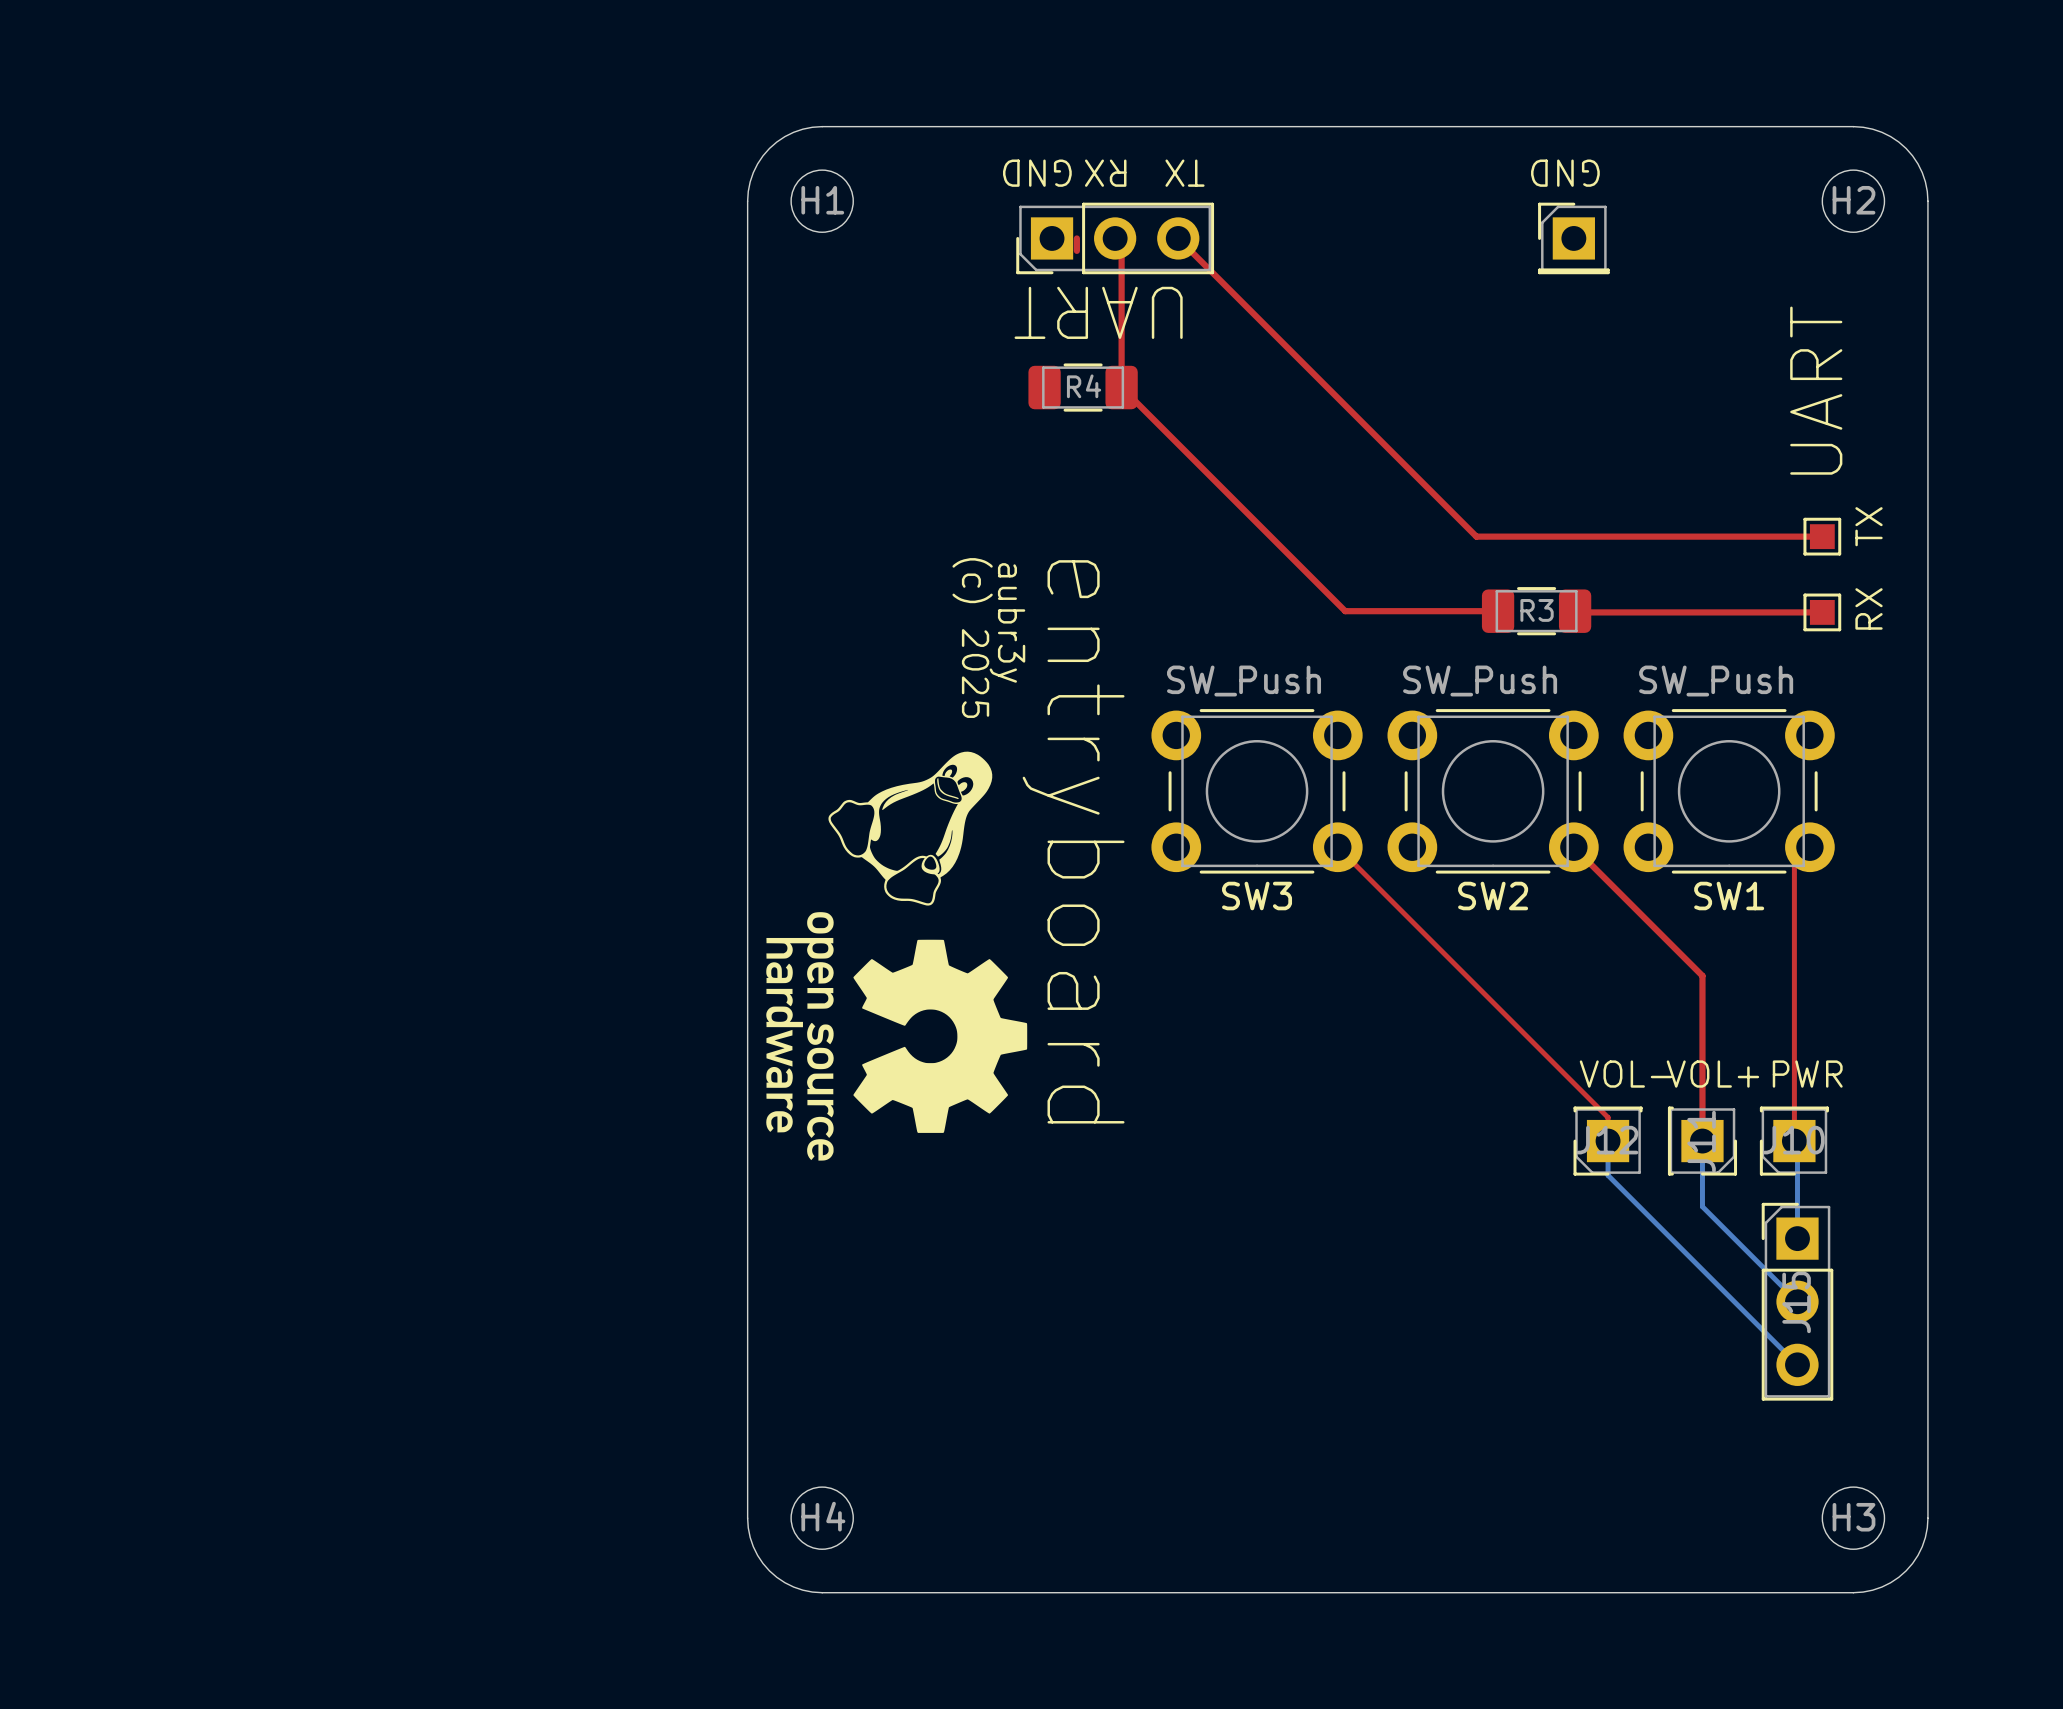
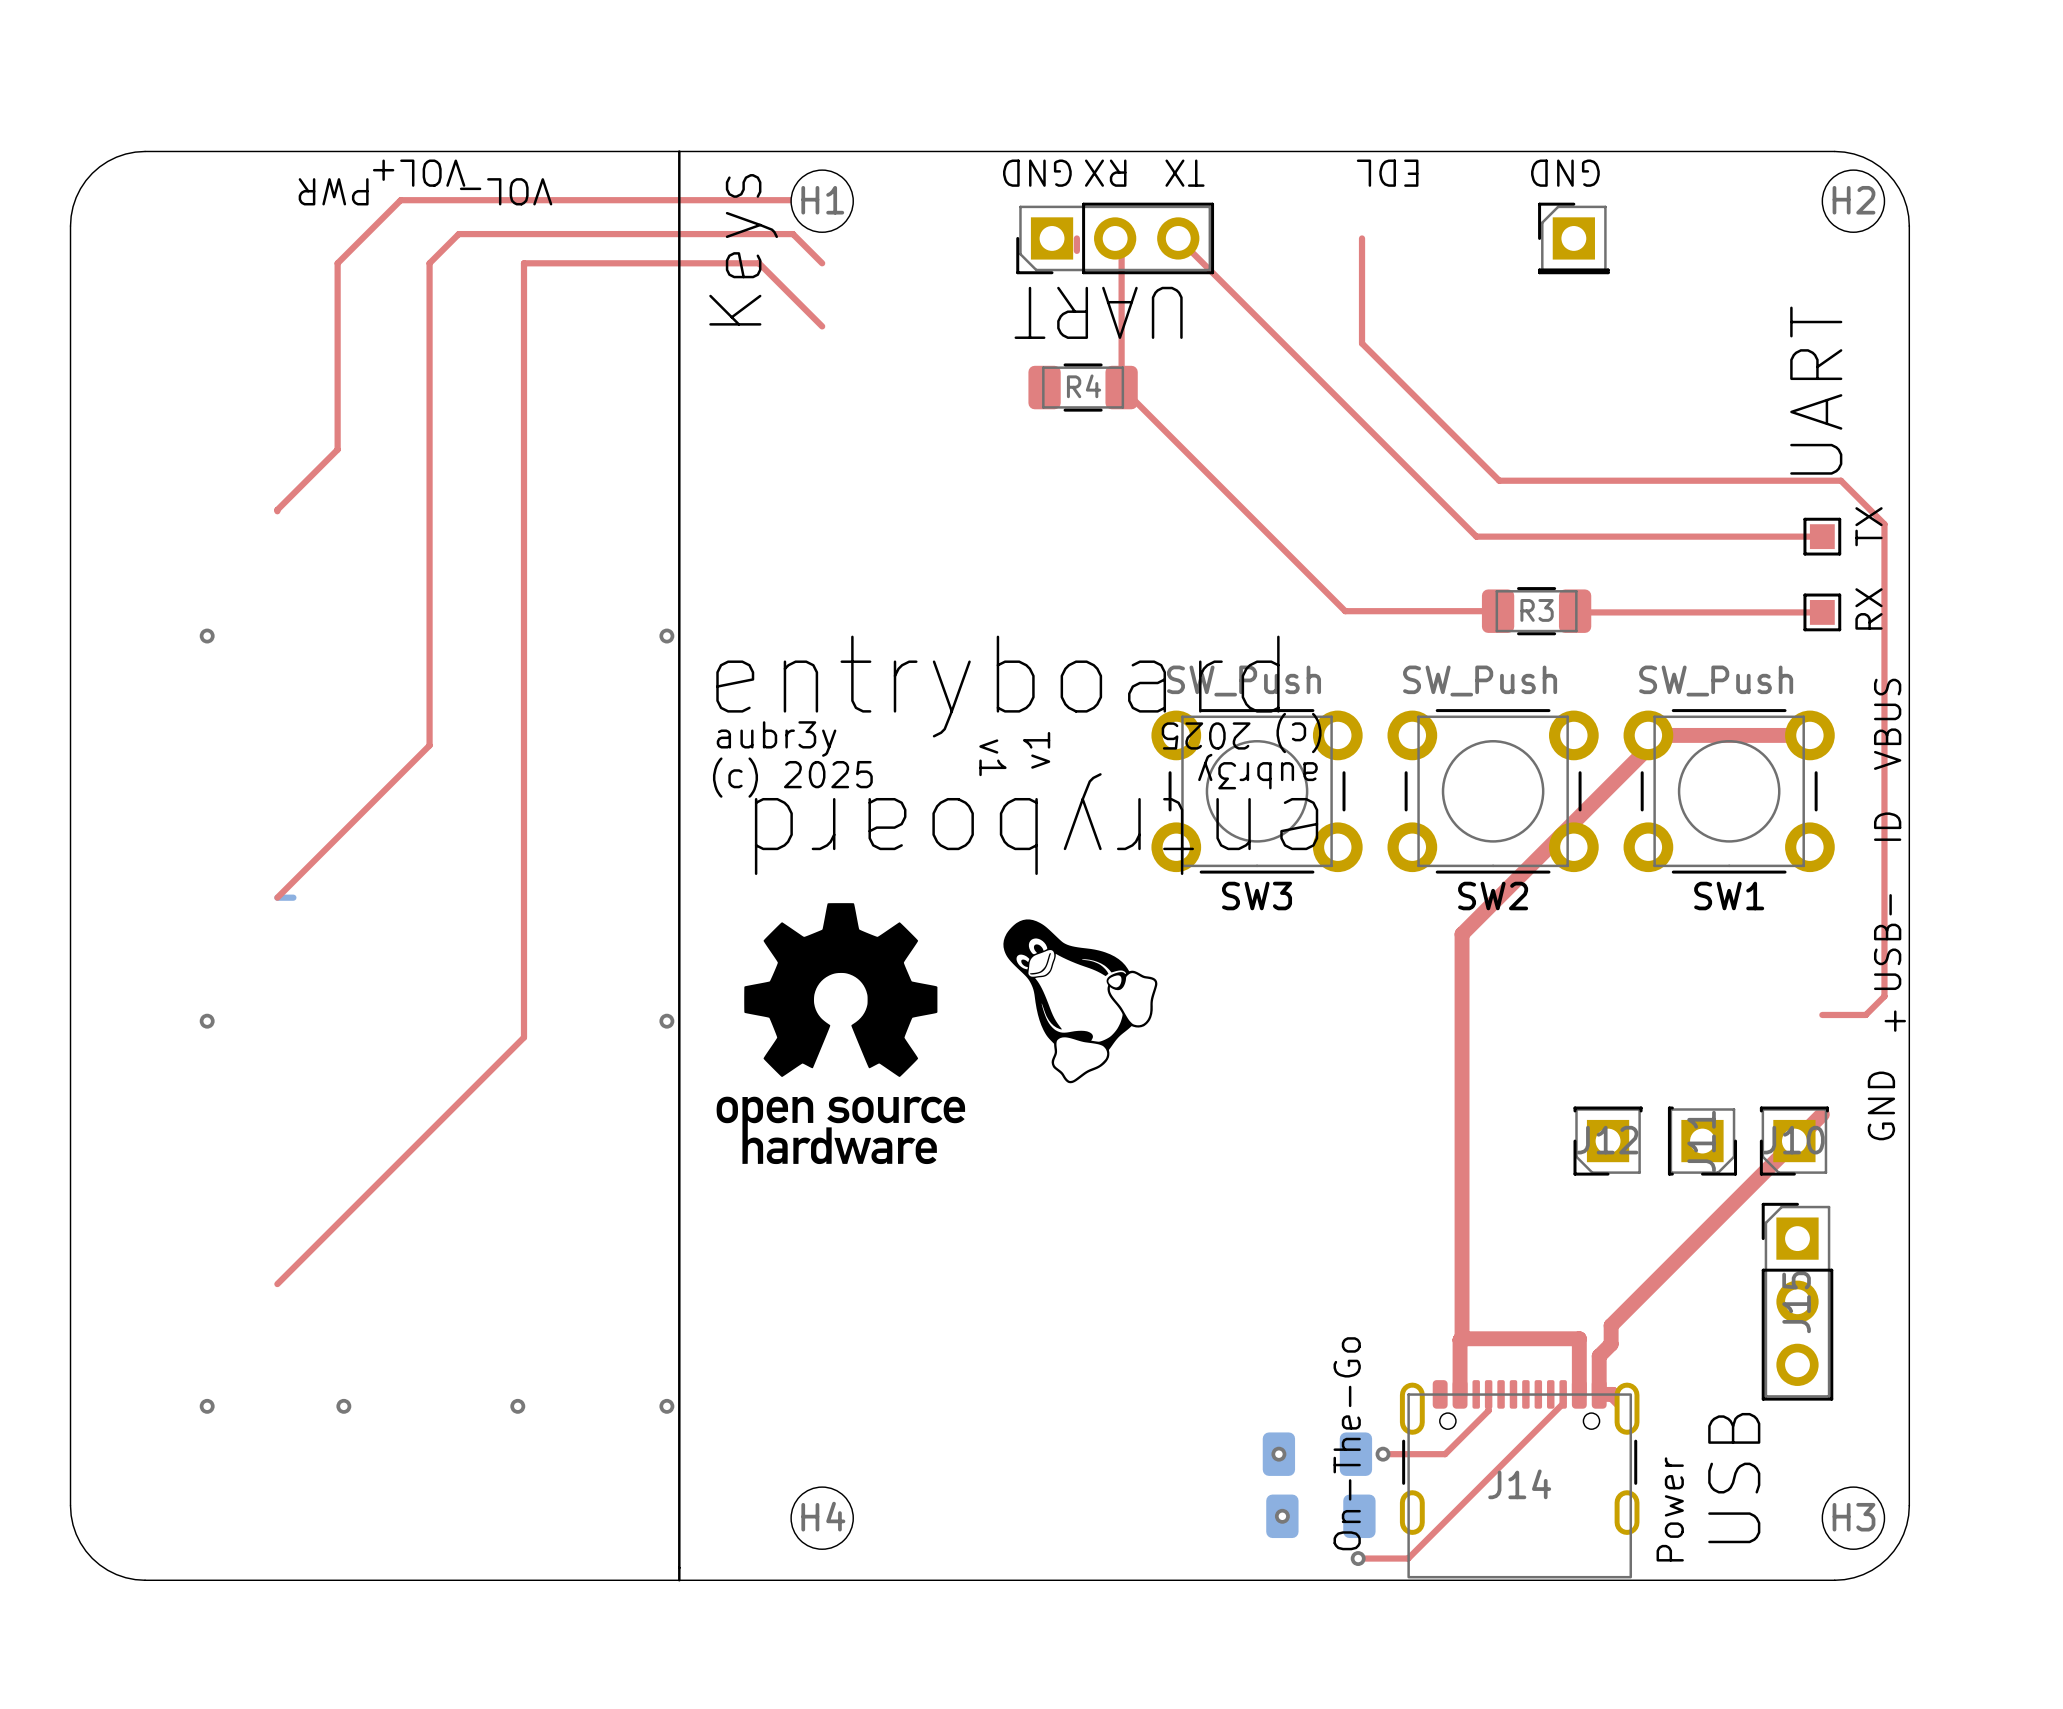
board edge: (822, 126) (1853, 126) (1881, 132) (1898, 142) (1912, 155) (1922, 172) (1927, 201) (1927, 1518) (1922, 1546) (1912, 1563) (1898, 1577) (1881, 1587) (1853, 1592) (822, 1592) (802, 1590) (784, 1582) (763, 1563) (750, 1537) (747, 1518) (747, 201) (753, 172) (769, 148) (793, 132) (822, 126) -> (145, 151) (116, 157) (92, 173) (76, 197) (70, 226) (70, 1505) (76, 1534) (85, 1551) (99, 1564) (116, 1574) (145, 1580) (1834, 1580) (1863, 1574) (1880, 1564) (1893, 1551) (1903, 1534) (1909, 1505) (1909, 226) (1906, 206) (1899, 188) (1880, 166) (1863, 157) (1834, 151) (145, 151)
line: none -> (679, 151) (679, 1580)
text: none -> VOL+ (419, 173)
text: none -> EDL (1387, 173)
text: none -> PWR (333, 191)
text: none -> VOL- (506, 191)
top track: none -> (822, 200) (400, 200) (337, 263) (337, 449) (277, 511)
top track: none -> (1362, 238) (1362, 343) (1499, 480) (1840, 480) (1884, 524) (1884, 996) (1865, 1014) (1822, 1014)
text: none -> Keys (743, 249)
top track: none -> (822, 263) (792, 234) (458, 234) (429, 263) (429, 745) (277, 897)
top track: none -> (822, 326) (759, 263) (524, 263) (524, 1037) (277, 1284)
text: aubr3y (1007, 622) -> none
via: none -> (207, 636)
via: none -> (666, 636)
text: (c) 2025 (972, 638) -> none
text: none -> entryboard (997, 686)
text: none -> VBUS (1887, 724)
text: none -> (c) 2025 (1241, 733)
top track: none -> (1822, 735) (1660, 735) (1462, 934) (1462, 1338) (1460, 1339) (1460, 1394)
text: none -> aubr3y (776, 739)
text: none -> v1 (1036, 750)
drawing: [766, 751, 1028, 1161] -> none
text: none -> v1 (992, 757)
text: none -> aubr3y (1257, 771)
text: none -> (c) 2025 (792, 777)
text: none -> entryboard (1036, 824)
text: none -> ID (1887, 826)
text: entryboard (1073, 841) -> none
top track: (1337, 847) (1608, 1117) (1608, 1141) -> none
top track: (1573, 847) (1702, 975) (1702, 1141) -> none
top track: (1809, 847) (1794, 862) (1794, 1141) -> none
bottom track: none -> (277, 897) (293, 897)
drawing: none -> [716, 903, 966, 1165]
text: none -> - (1890, 904)
drawing: none -> [1003, 919, 1158, 1084]
text: none -> USB (1887, 956)
via: none -> (207, 1021)
via: none -> (666, 1021)
text: none -> + (1895, 1021)
text: VOL- (1625, 1074) -> none
text: VOL+ (1712, 1074) -> none
text: PWR (1807, 1074) -> none
text: none -> GND (1881, 1105)
top track: none -> (1822, 1114) (1611, 1325) (1611, 1344) (1599, 1356) (1599, 1394) (1612, 1394) (1627, 1408)
bottom track: (1608, 1141) (1608, 1175) (1797, 1364) -> none
bottom track: (1702, 1141) (1702, 1206) (1797, 1301) -> none
bottom track: (1794, 1141) (1797, 1144) (1797, 1238) -> none
top track: none -> (1461, 1338) (1579, 1338) (1579, 1394)
top track: none -> (1488, 1387) (1488, 1410) (1445, 1454) (1383, 1454)
top track: none -> (1563, 1387) (1563, 1403) (1408, 1558) (1358, 1558)
via: none -> (207, 1406)
via: none -> (343, 1406)
via: none -> (517, 1406)
via: none -> (666, 1406)
text: none -> On-The-Go (1347, 1443)
via: none -> (1278, 1454)
part: none -> (1317, 1454)
via: none -> (1383, 1454)
text: none -> USB (1734, 1478)
J14: none -> (1519, 1479)
text: none -> Power (1670, 1509)
via: none -> (1282, 1516)
part: none -> (1320, 1516)
via: none -> (1358, 1558)

